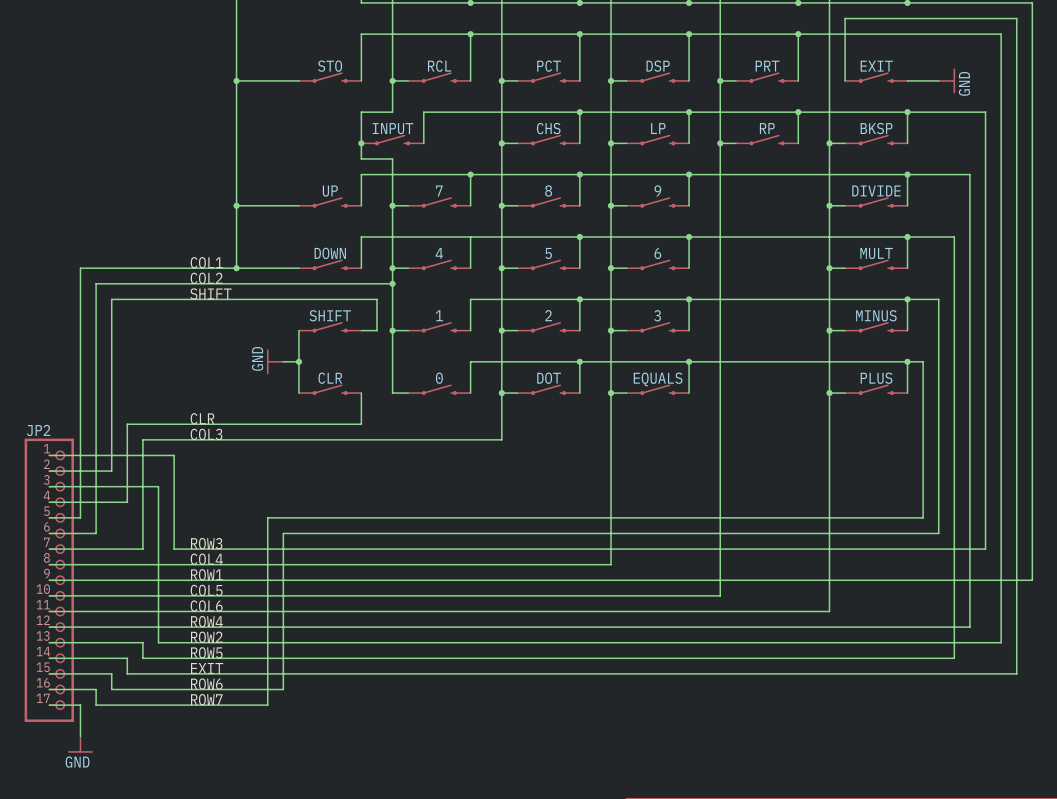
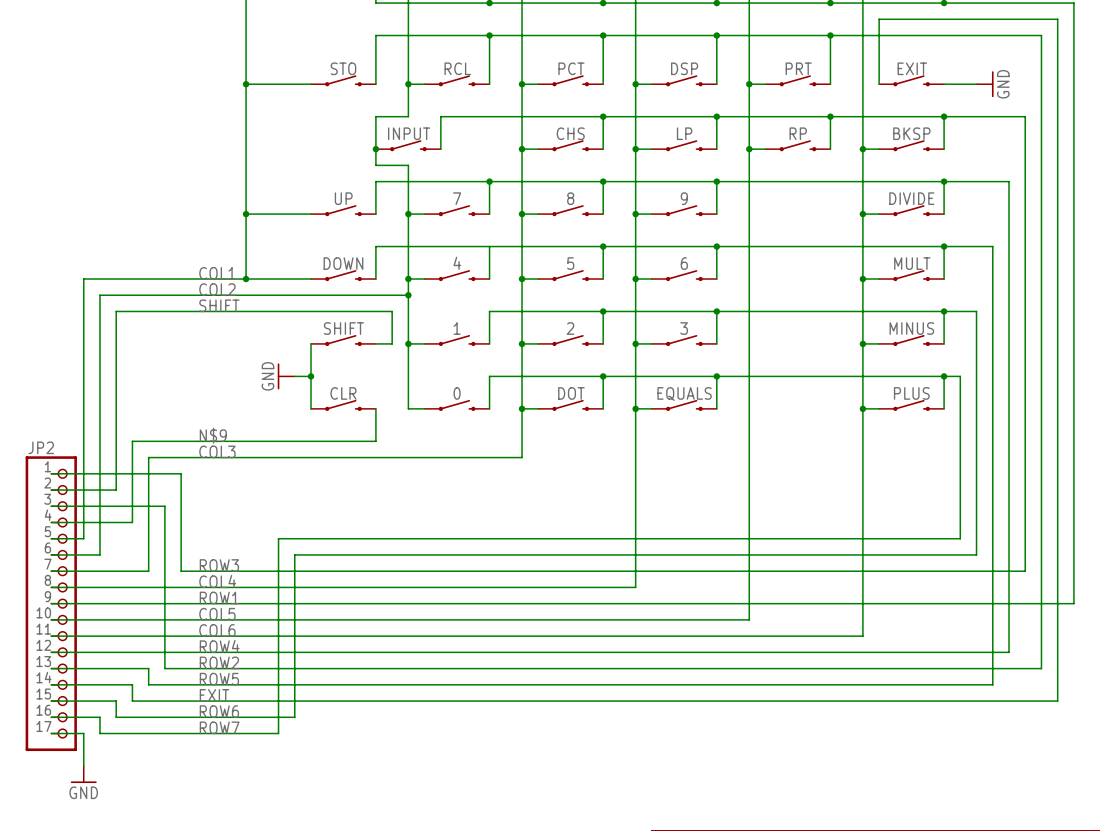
label: CLR (202, 418) -> N$9 (213, 435)

